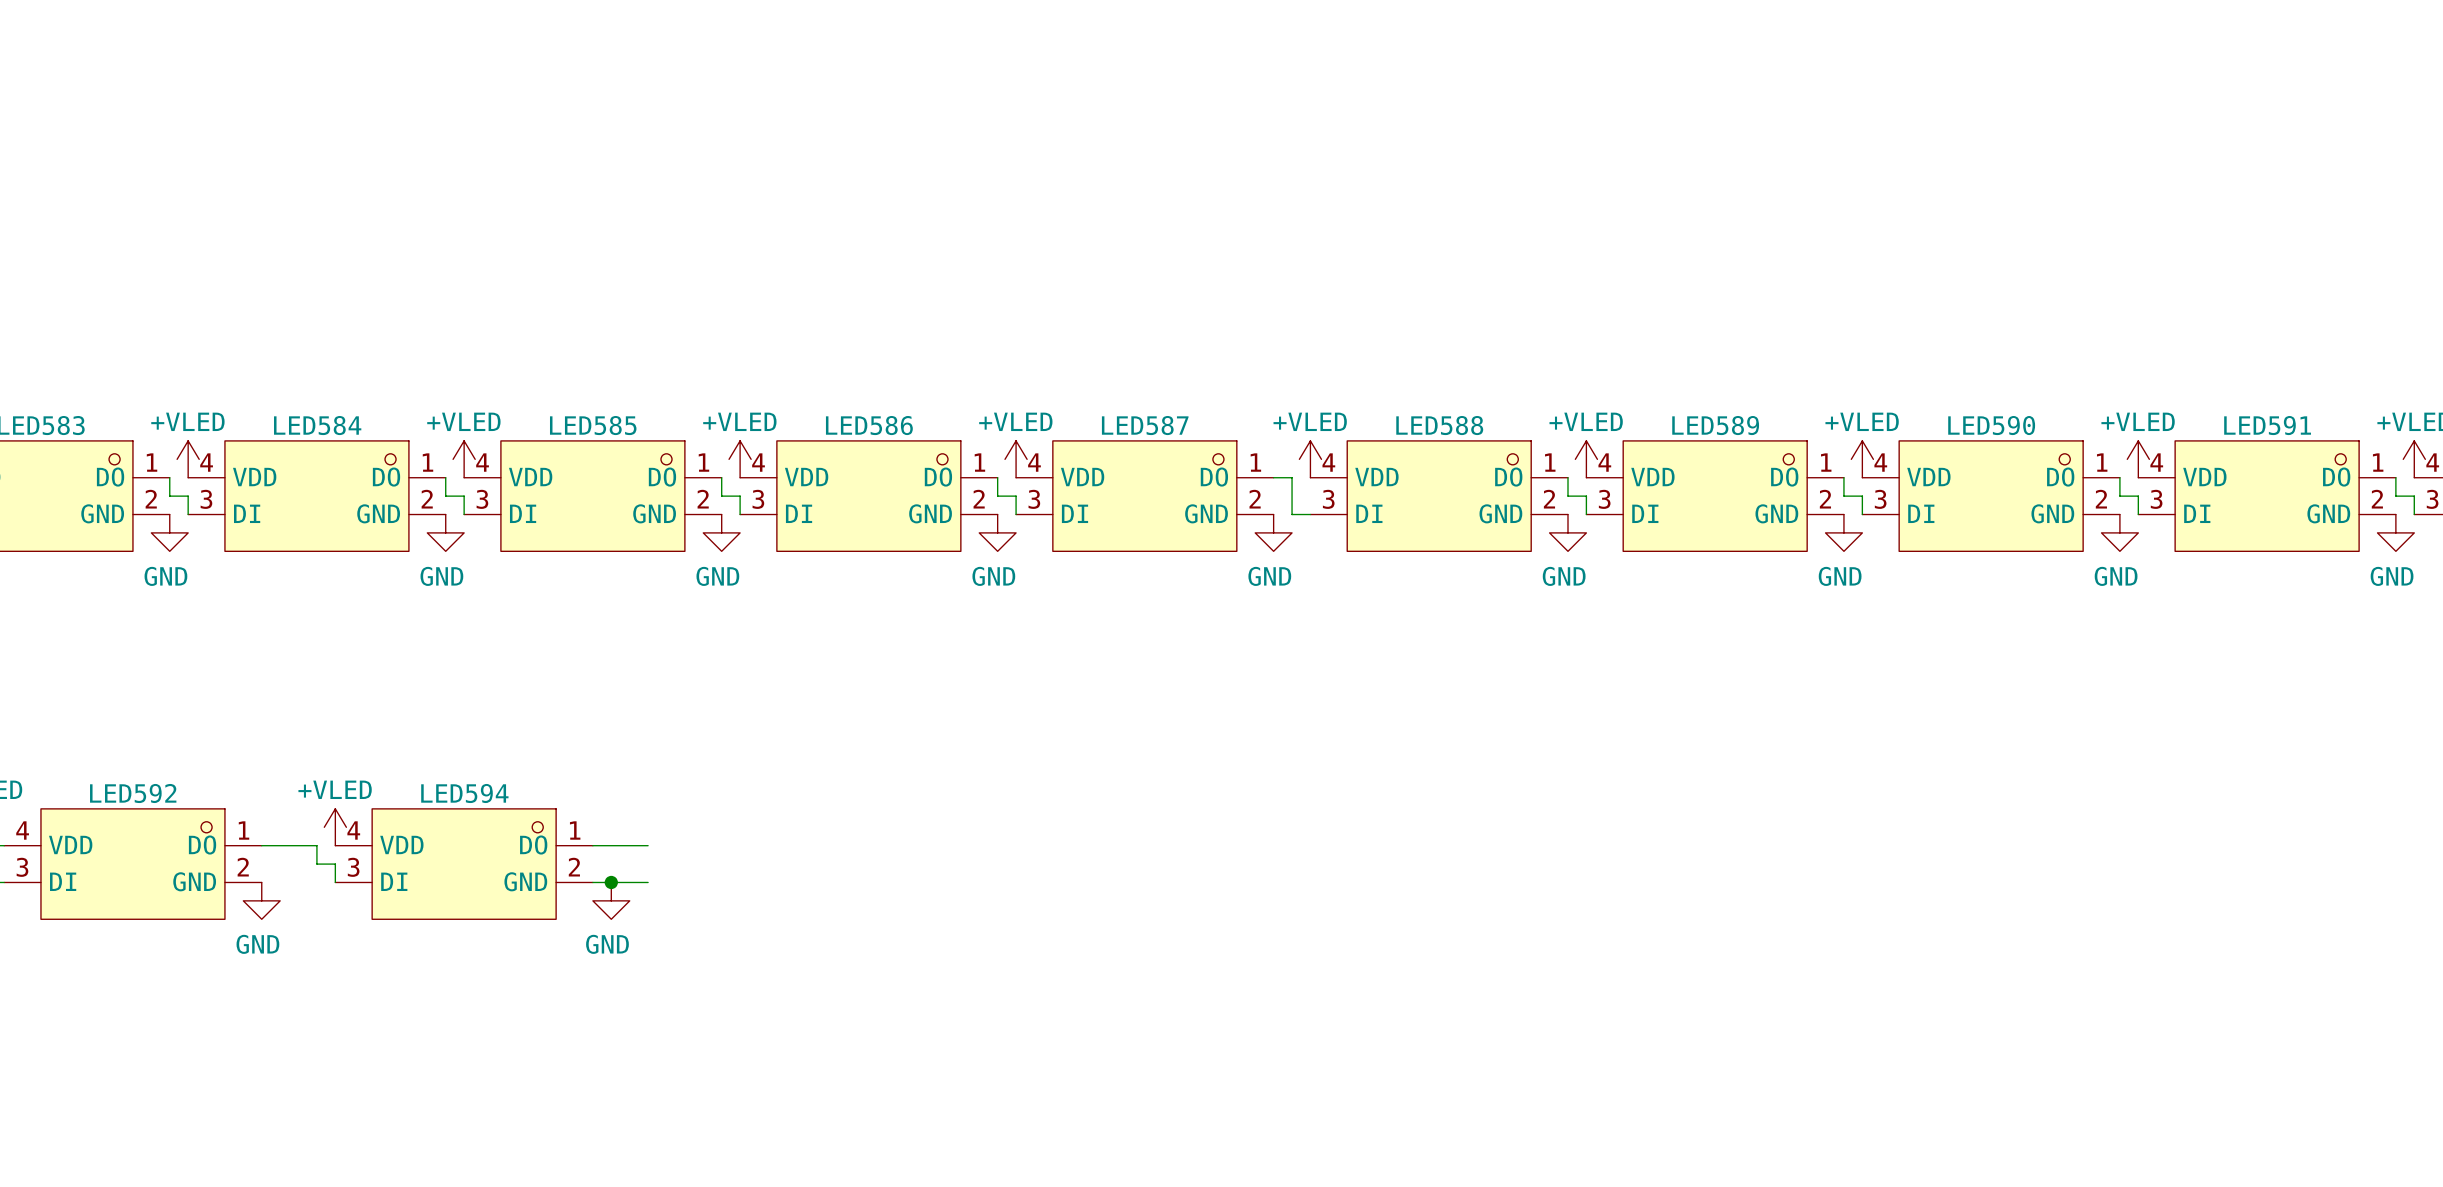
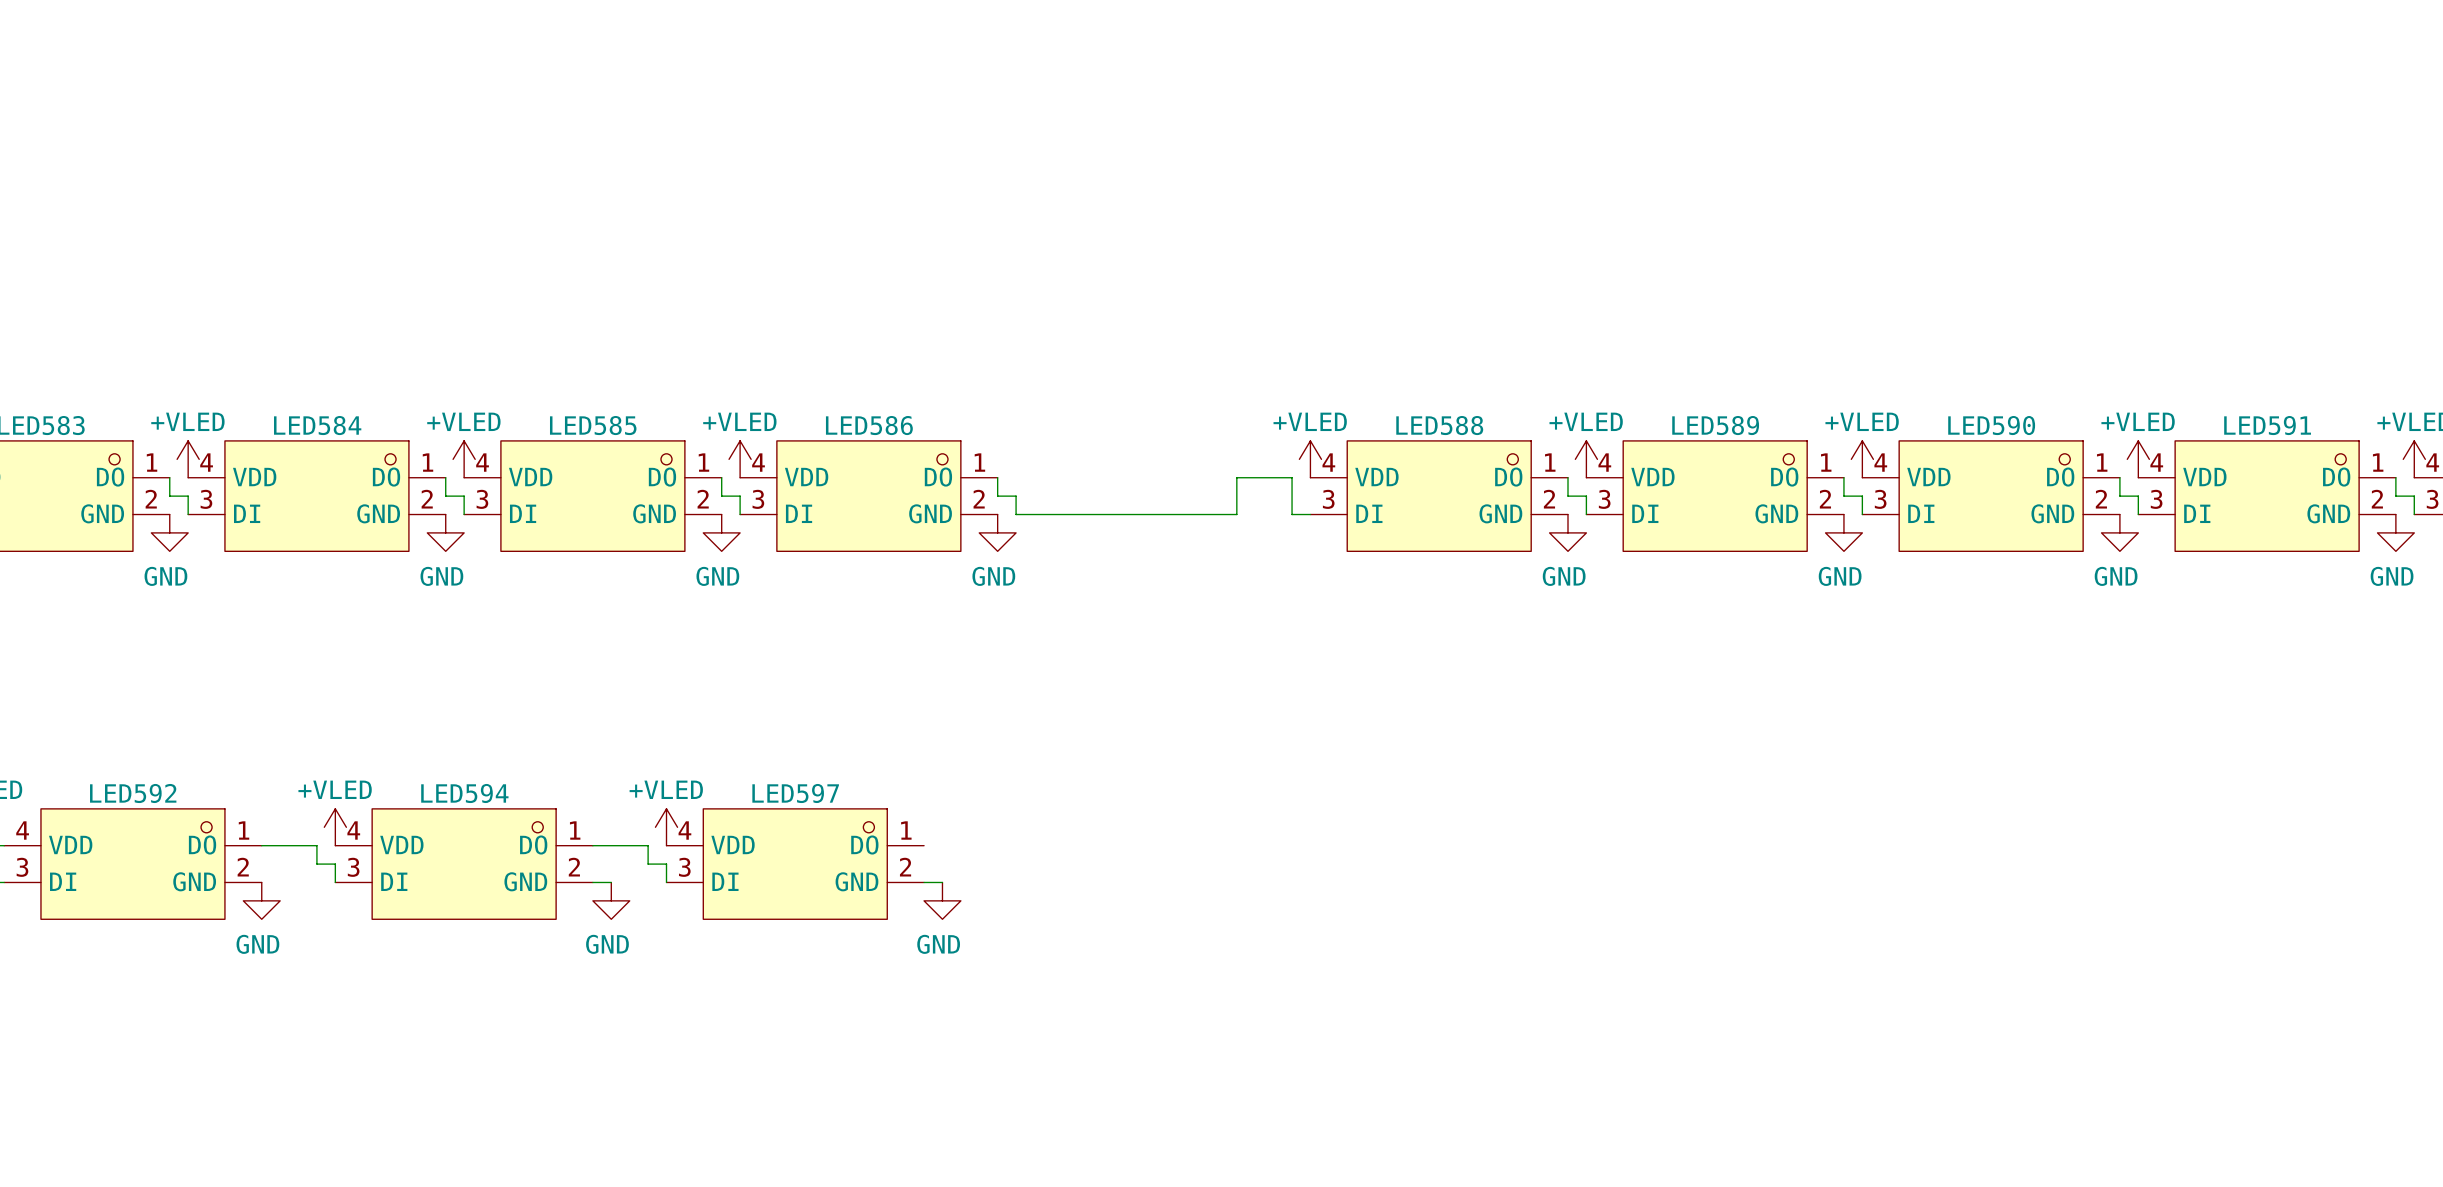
power symbol: +VLED (1016, 459) -> none
LED587: (1144, 496) -> none
power symbol: GND (1273, 532) -> none
power symbol: none -> +VLED (666, 827)
wire: none -> (648, 845) (648, 864) (666, 864) (666, 882)
LED597: none -> (795, 864)
wire: (611, 882) (648, 882) -> none
junction: (611, 882) -> none
wire: none -> (924, 882) (942, 882)
power symbol: none -> GND (942, 900)

